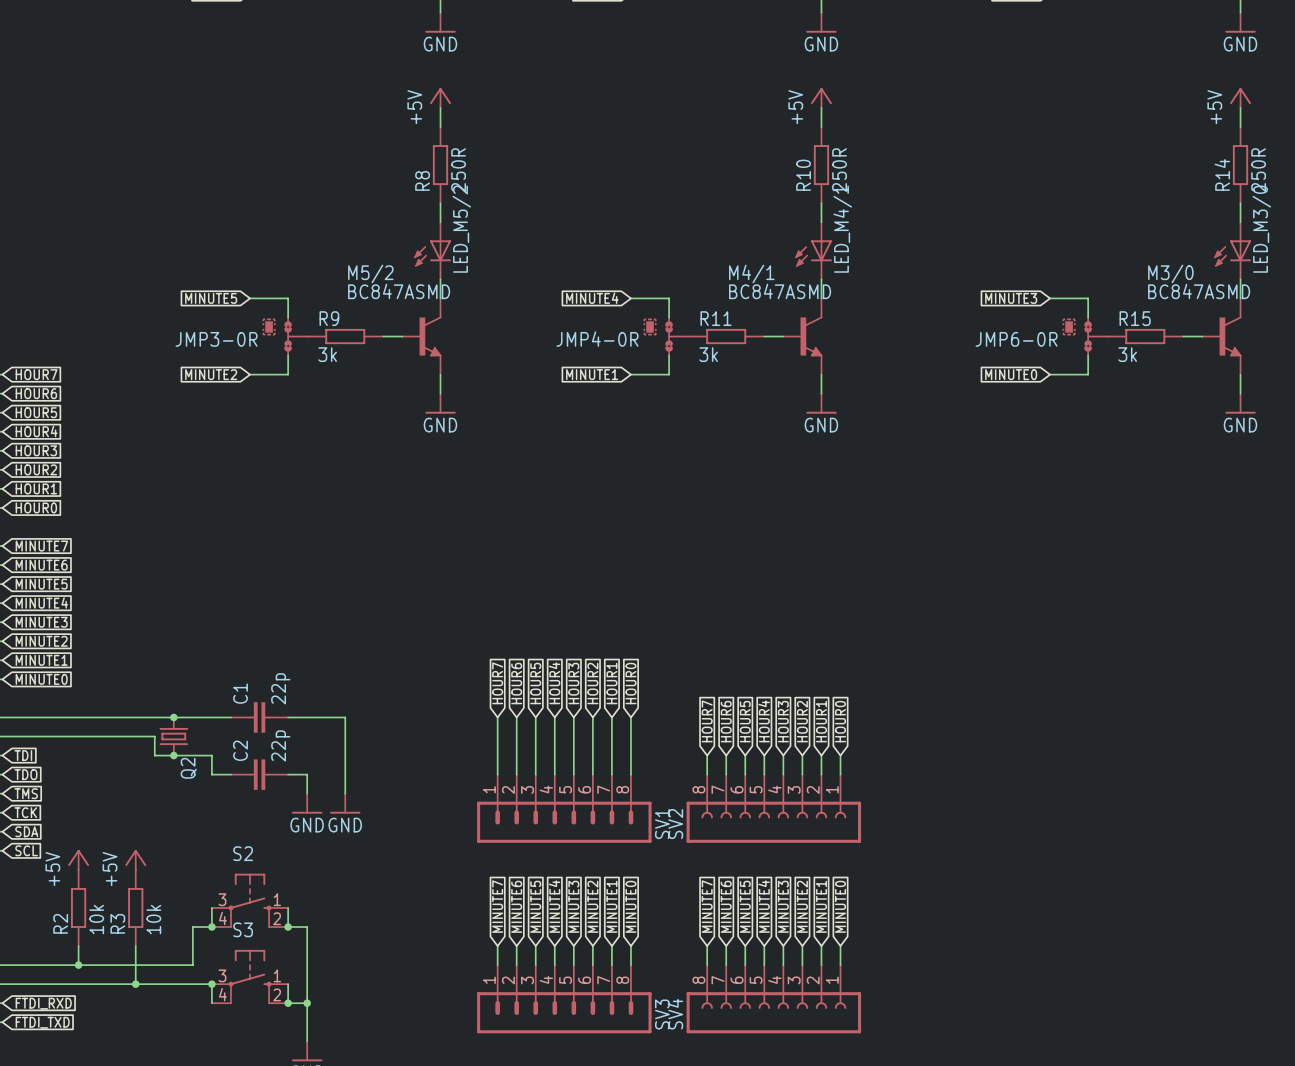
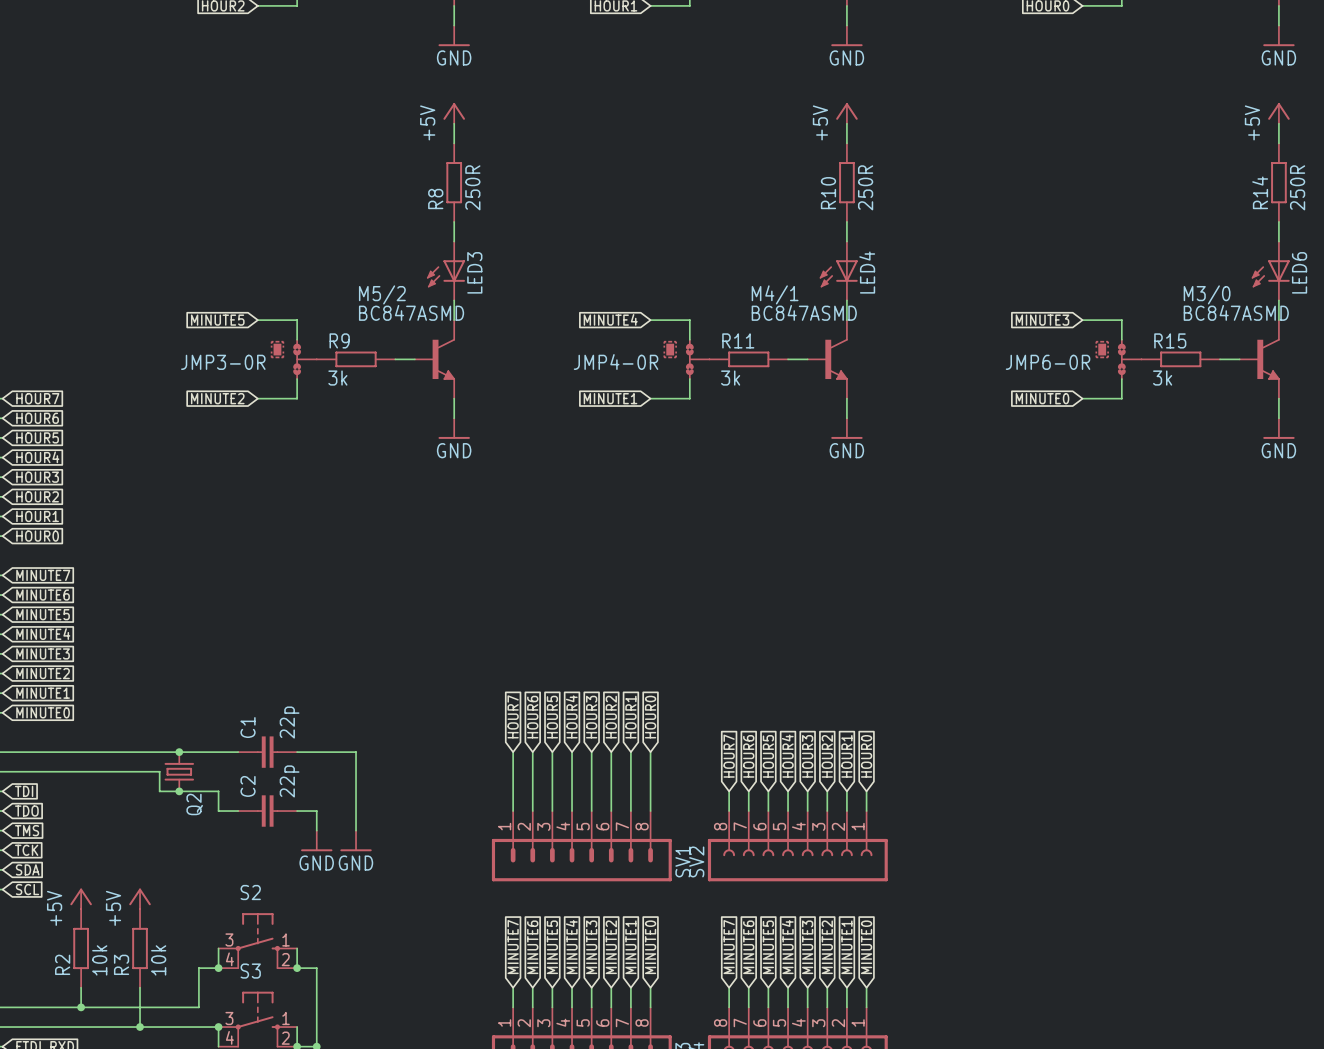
LED_M5/2 name: LED_M5/2 (461, 229) -> LED3 (474, 272)
LED_M4/1 name: LED_M4/1 (842, 229) -> LED4 (867, 272)
LED_M3/0 name: LED_M3/0 (1261, 229) -> LED6 (1299, 272)

